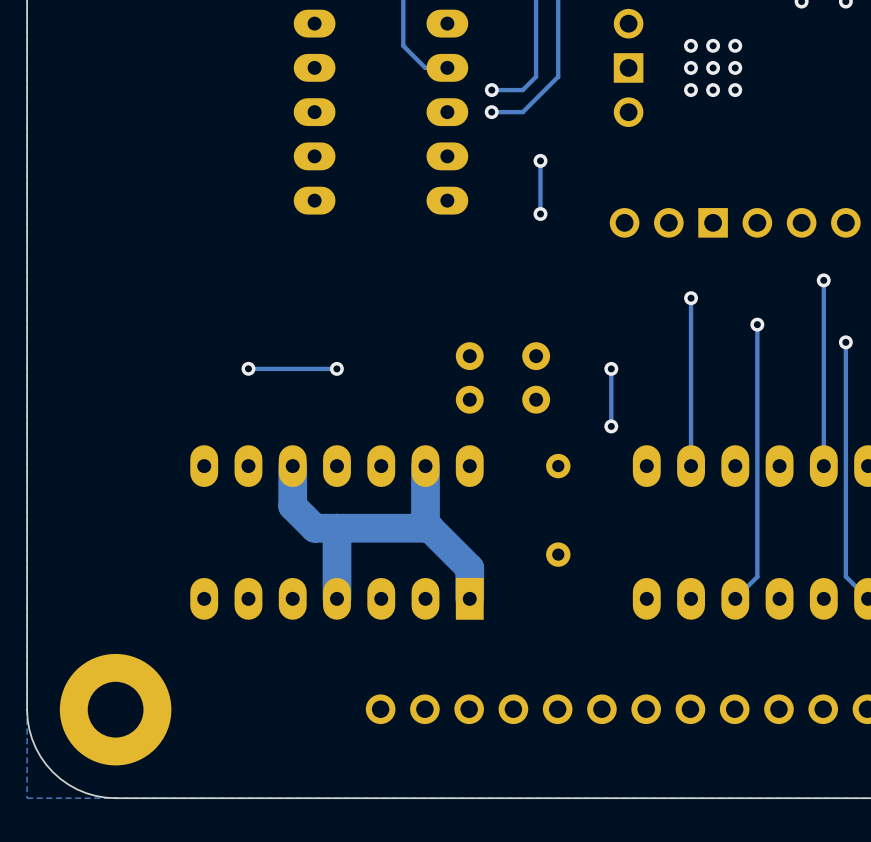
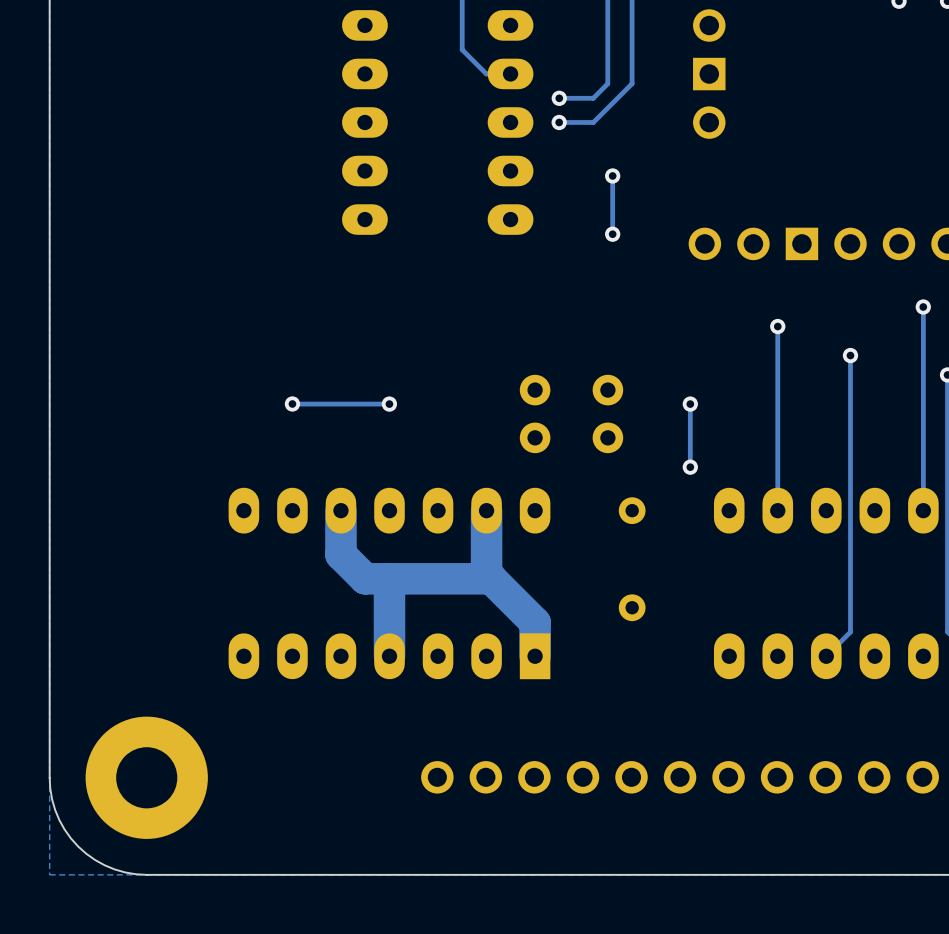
via: (690, 45) -> none
via: (713, 45) -> none
via: (735, 45) -> none
via: (690, 67) -> none
via: (713, 67) -> none
via: (735, 67) -> none
via: (690, 90) -> none
via: (713, 90) -> none
via: (735, 90) -> none

